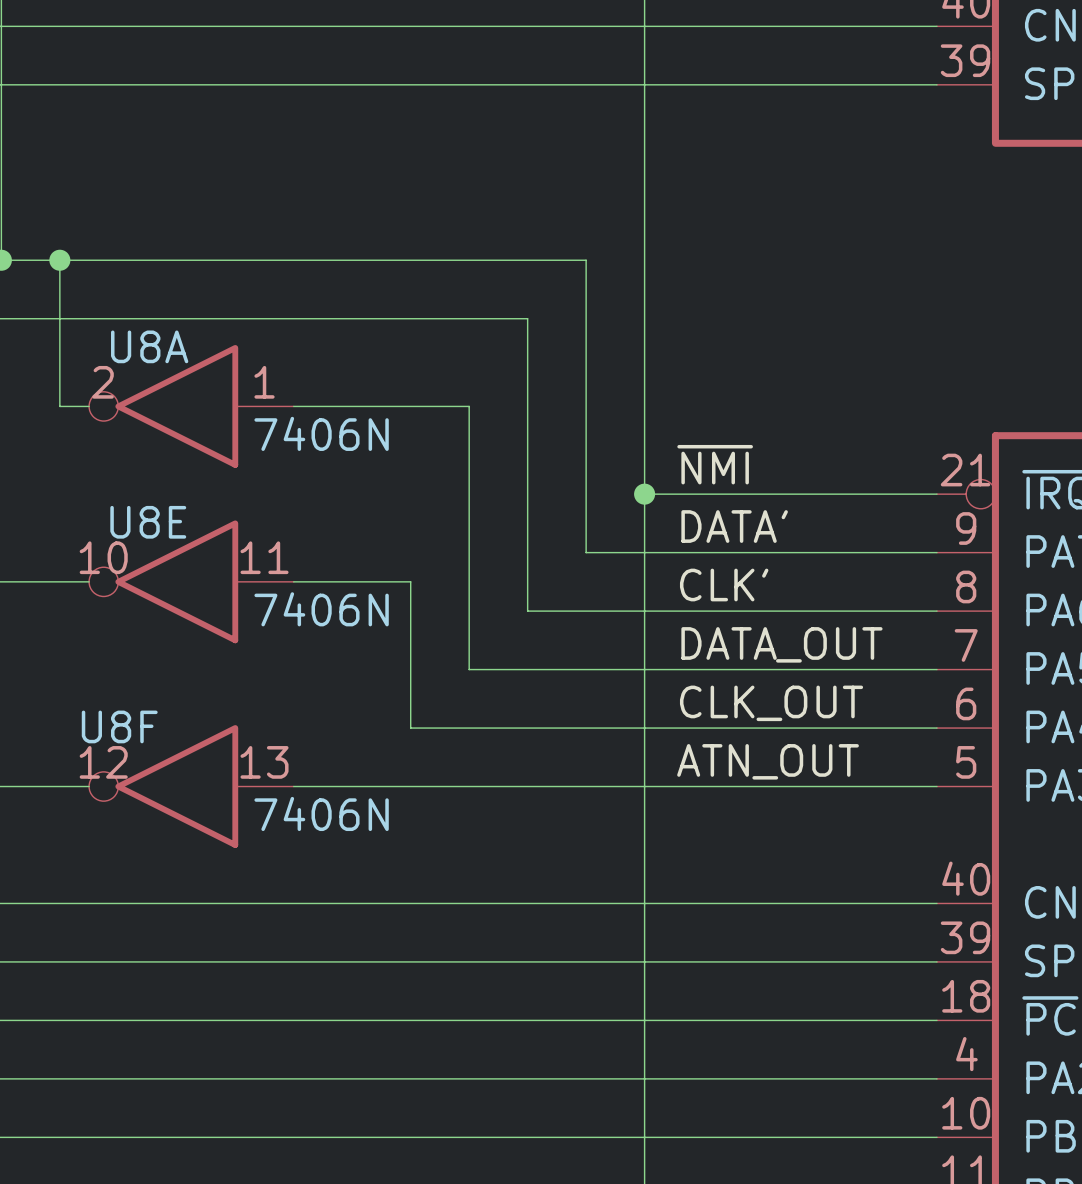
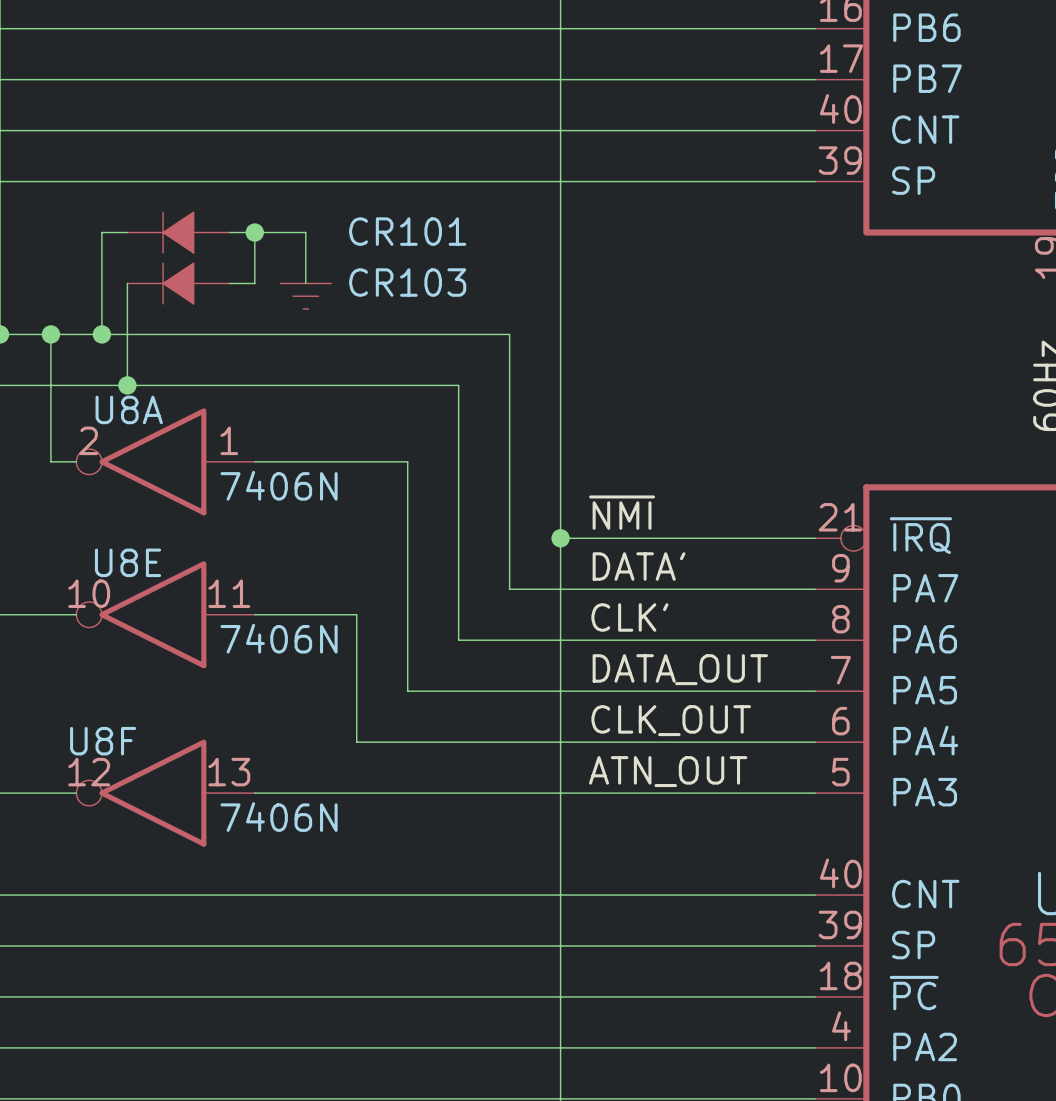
wire: none -> (127, 232) (101, 232) (101, 334)
CR101: none -> (178, 232)
wire: none -> (229, 232) (305, 232) (305, 283)
wire: none -> (254, 232) (254, 283) (229, 283)
junction: none -> (254, 232)
wire: none -> (127, 283) (127, 385)
CR103: none -> (178, 283)
power symbol: none -> (305, 296)
junction: none -> (101, 334)
junction: none -> (127, 385)

